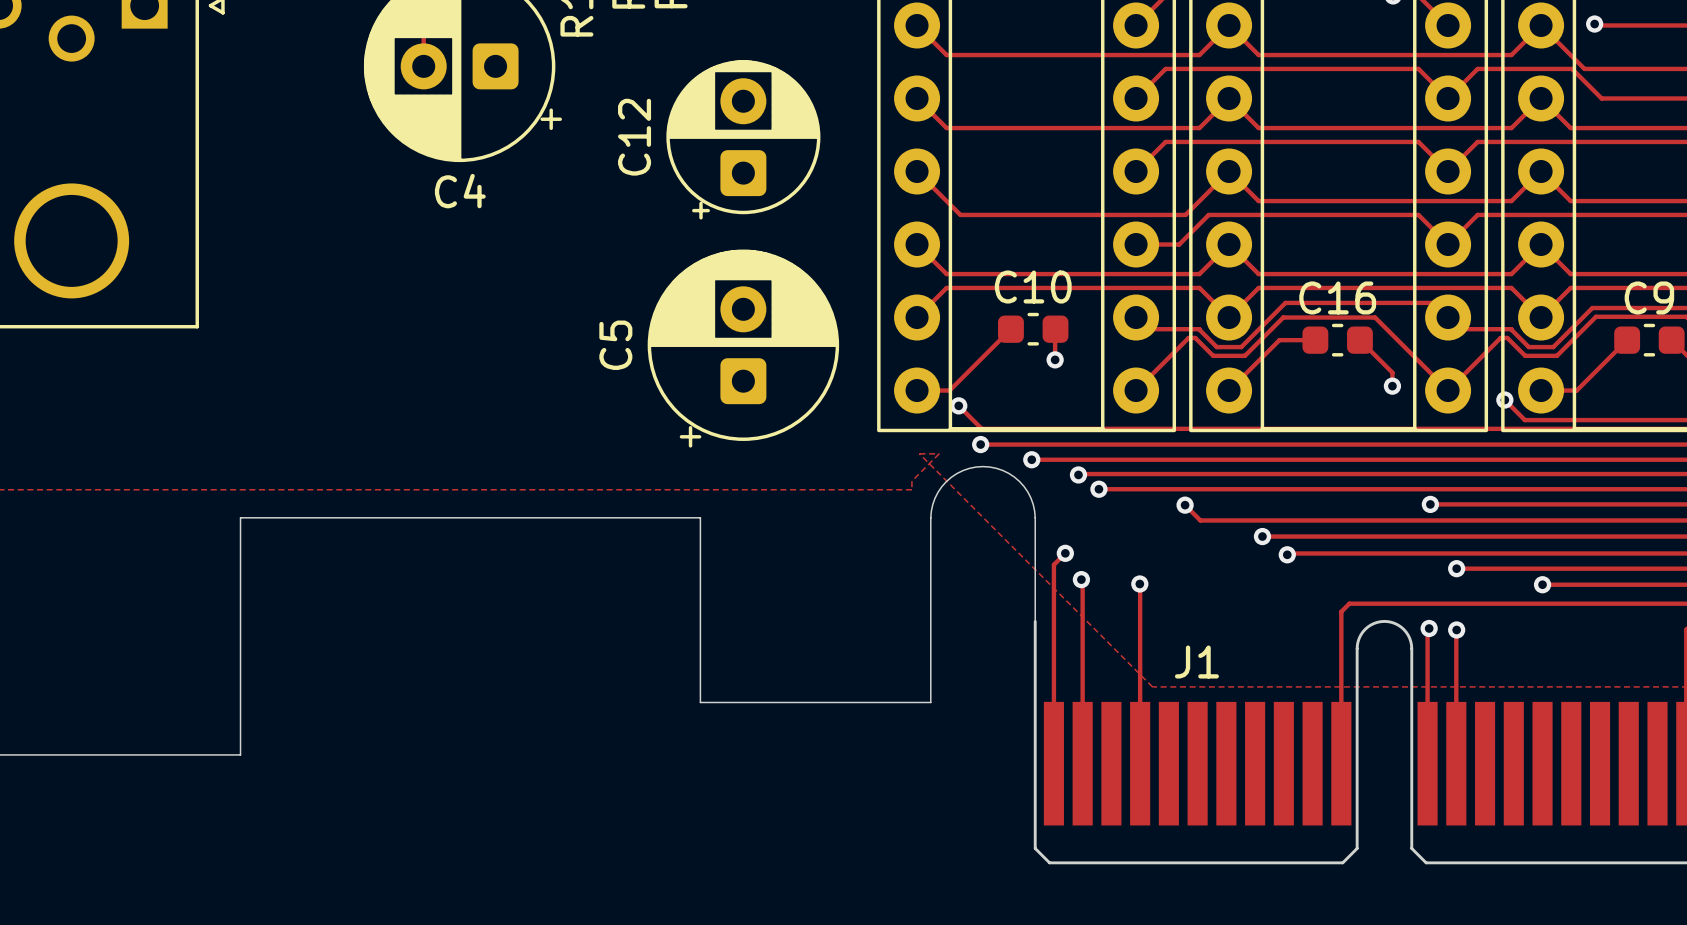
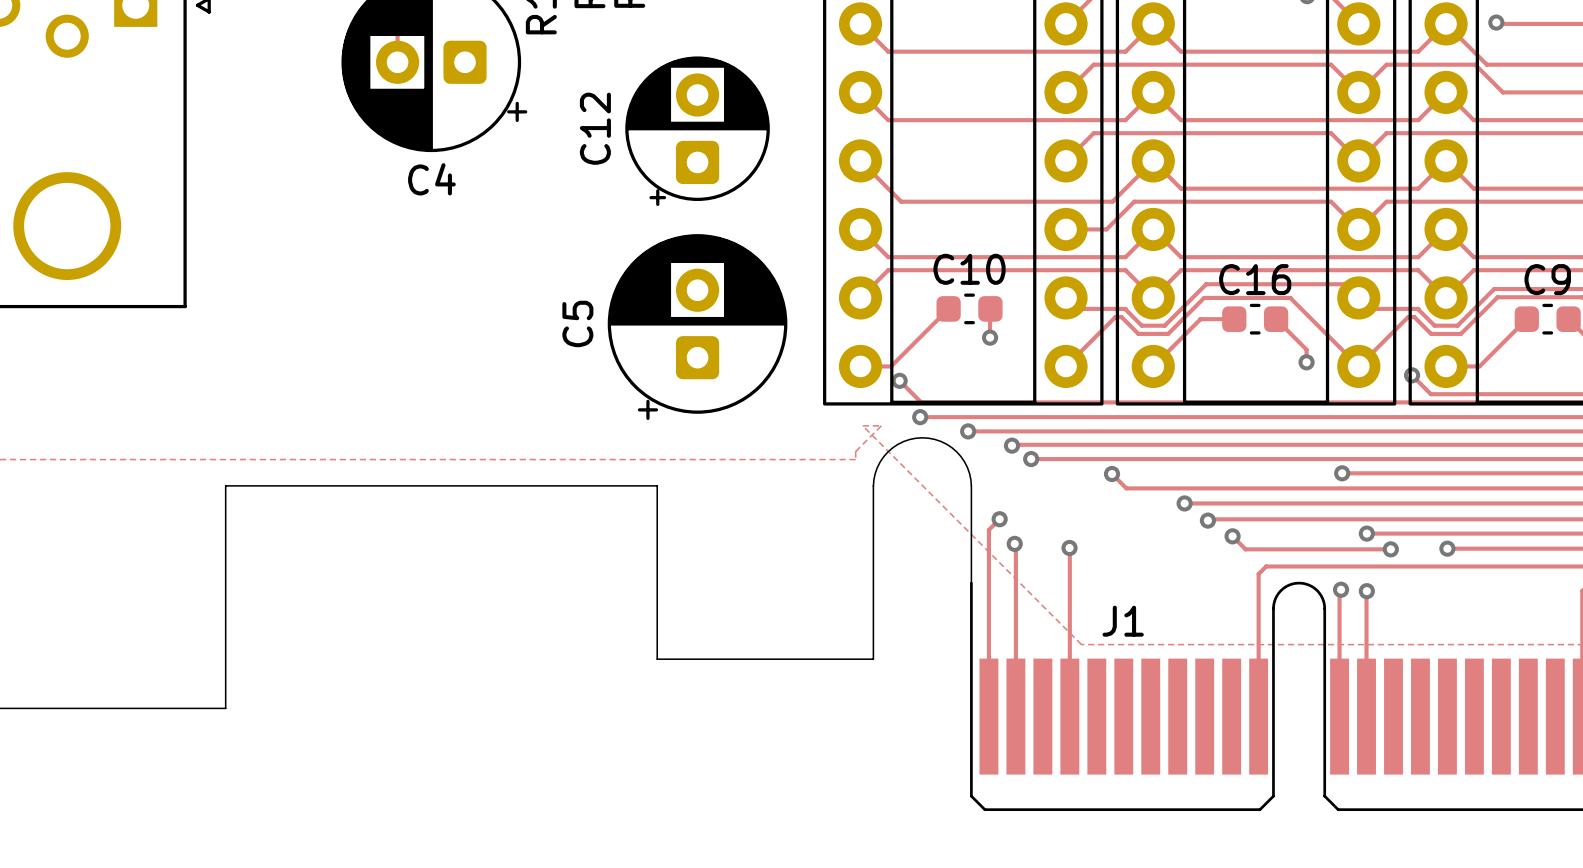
track: none -> (1232, 536) (1245, 549) (1390, 549)
via: none -> (1232, 536)
via: none -> (1390, 549)

